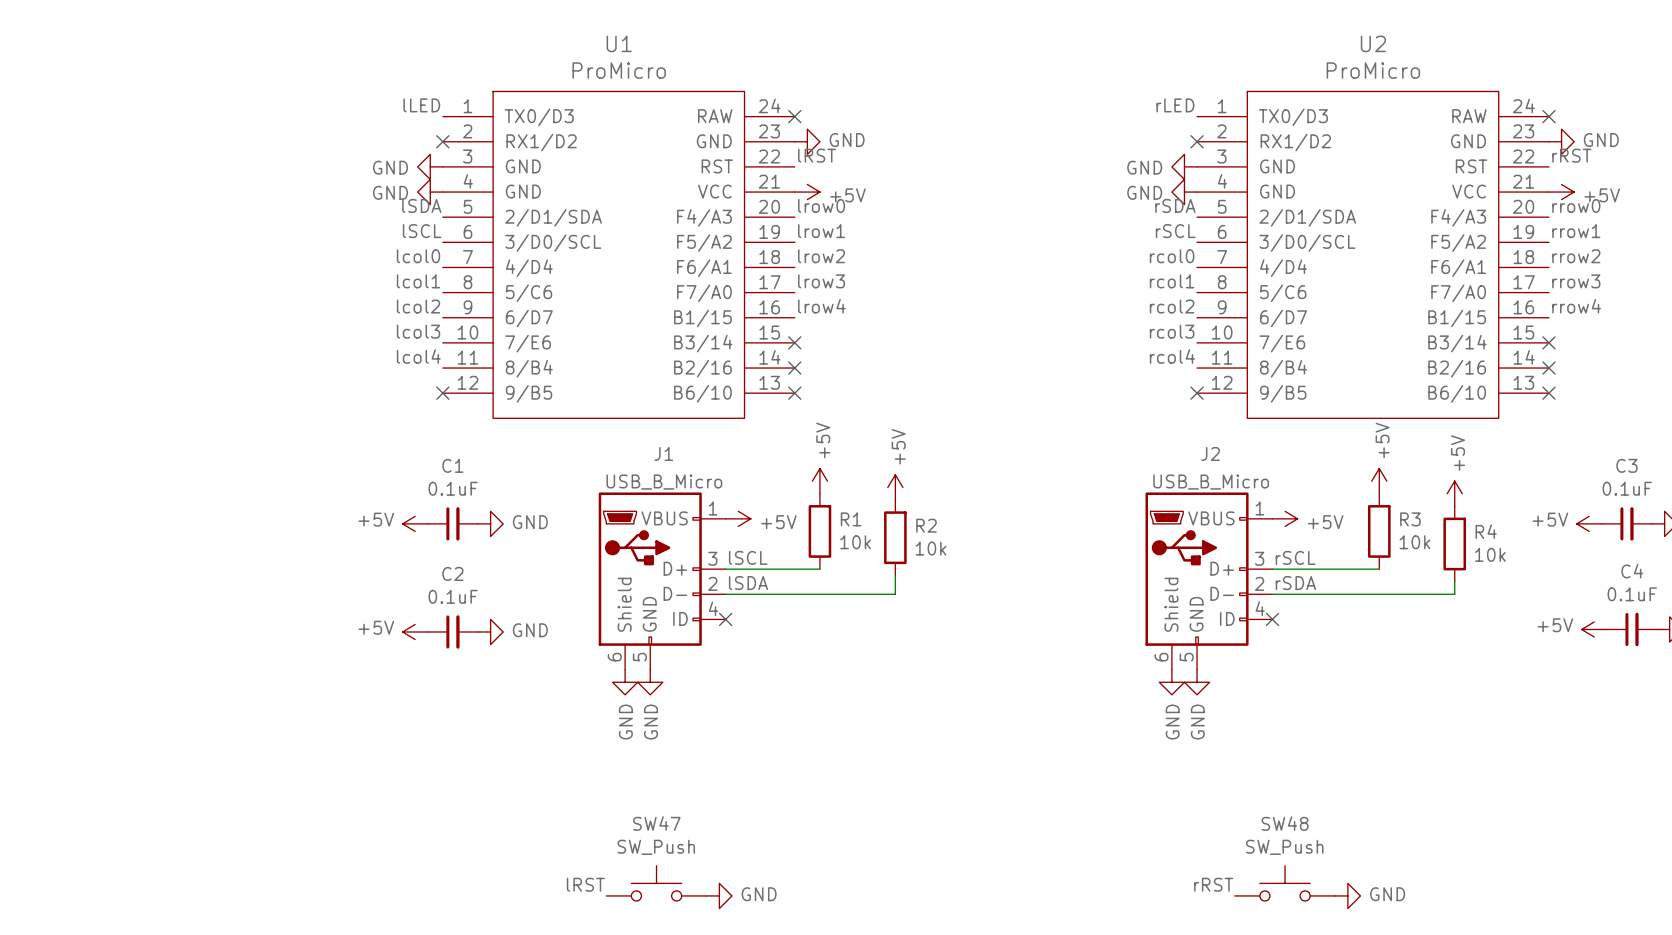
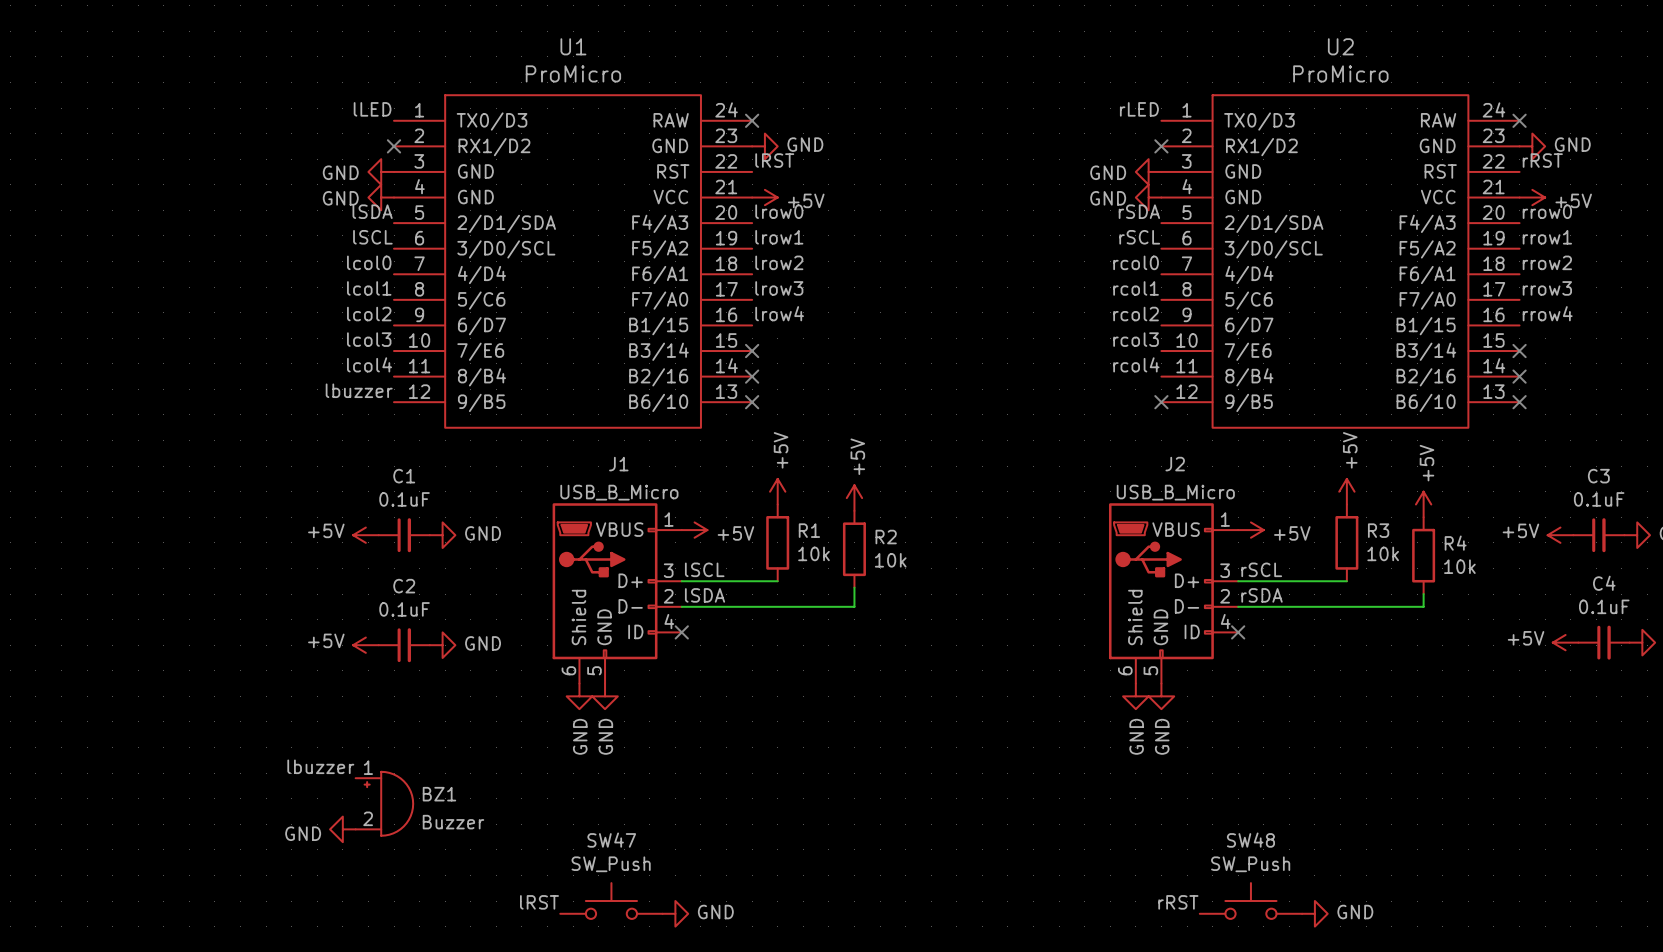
label: none -> lbuzzer (359, 390)
no-connect mark: (442, 393) -> none
label: none -> lbuzzer (320, 766)
BZ1: none -> Buzzer (384, 803)
power symbol: none -> GND (342, 829)

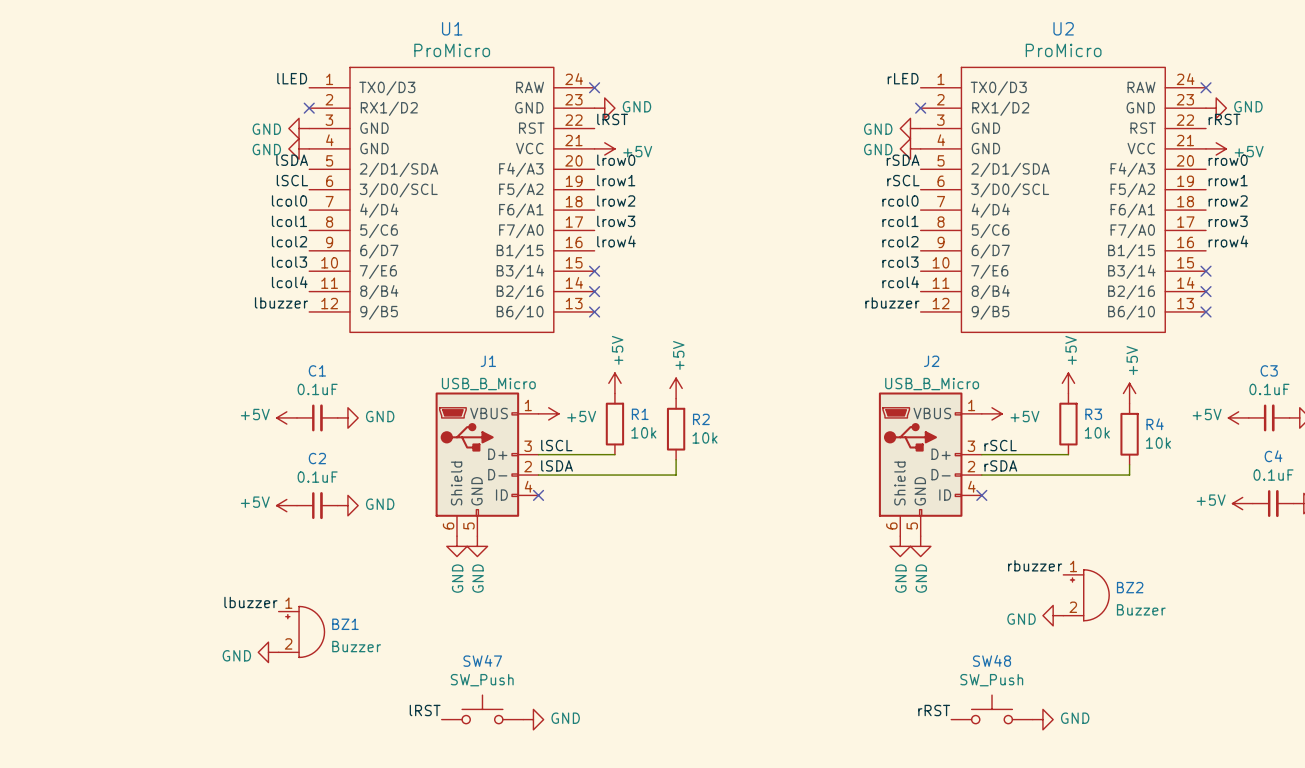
label: none -> rbuzzer (892, 302)
no-connect mark: (1161, 402) -> none
label: none -> rbuzzer (1035, 565)
BZ2: none -> Buzzer (1086, 595)
power symbol: none -> GND (1053, 615)

